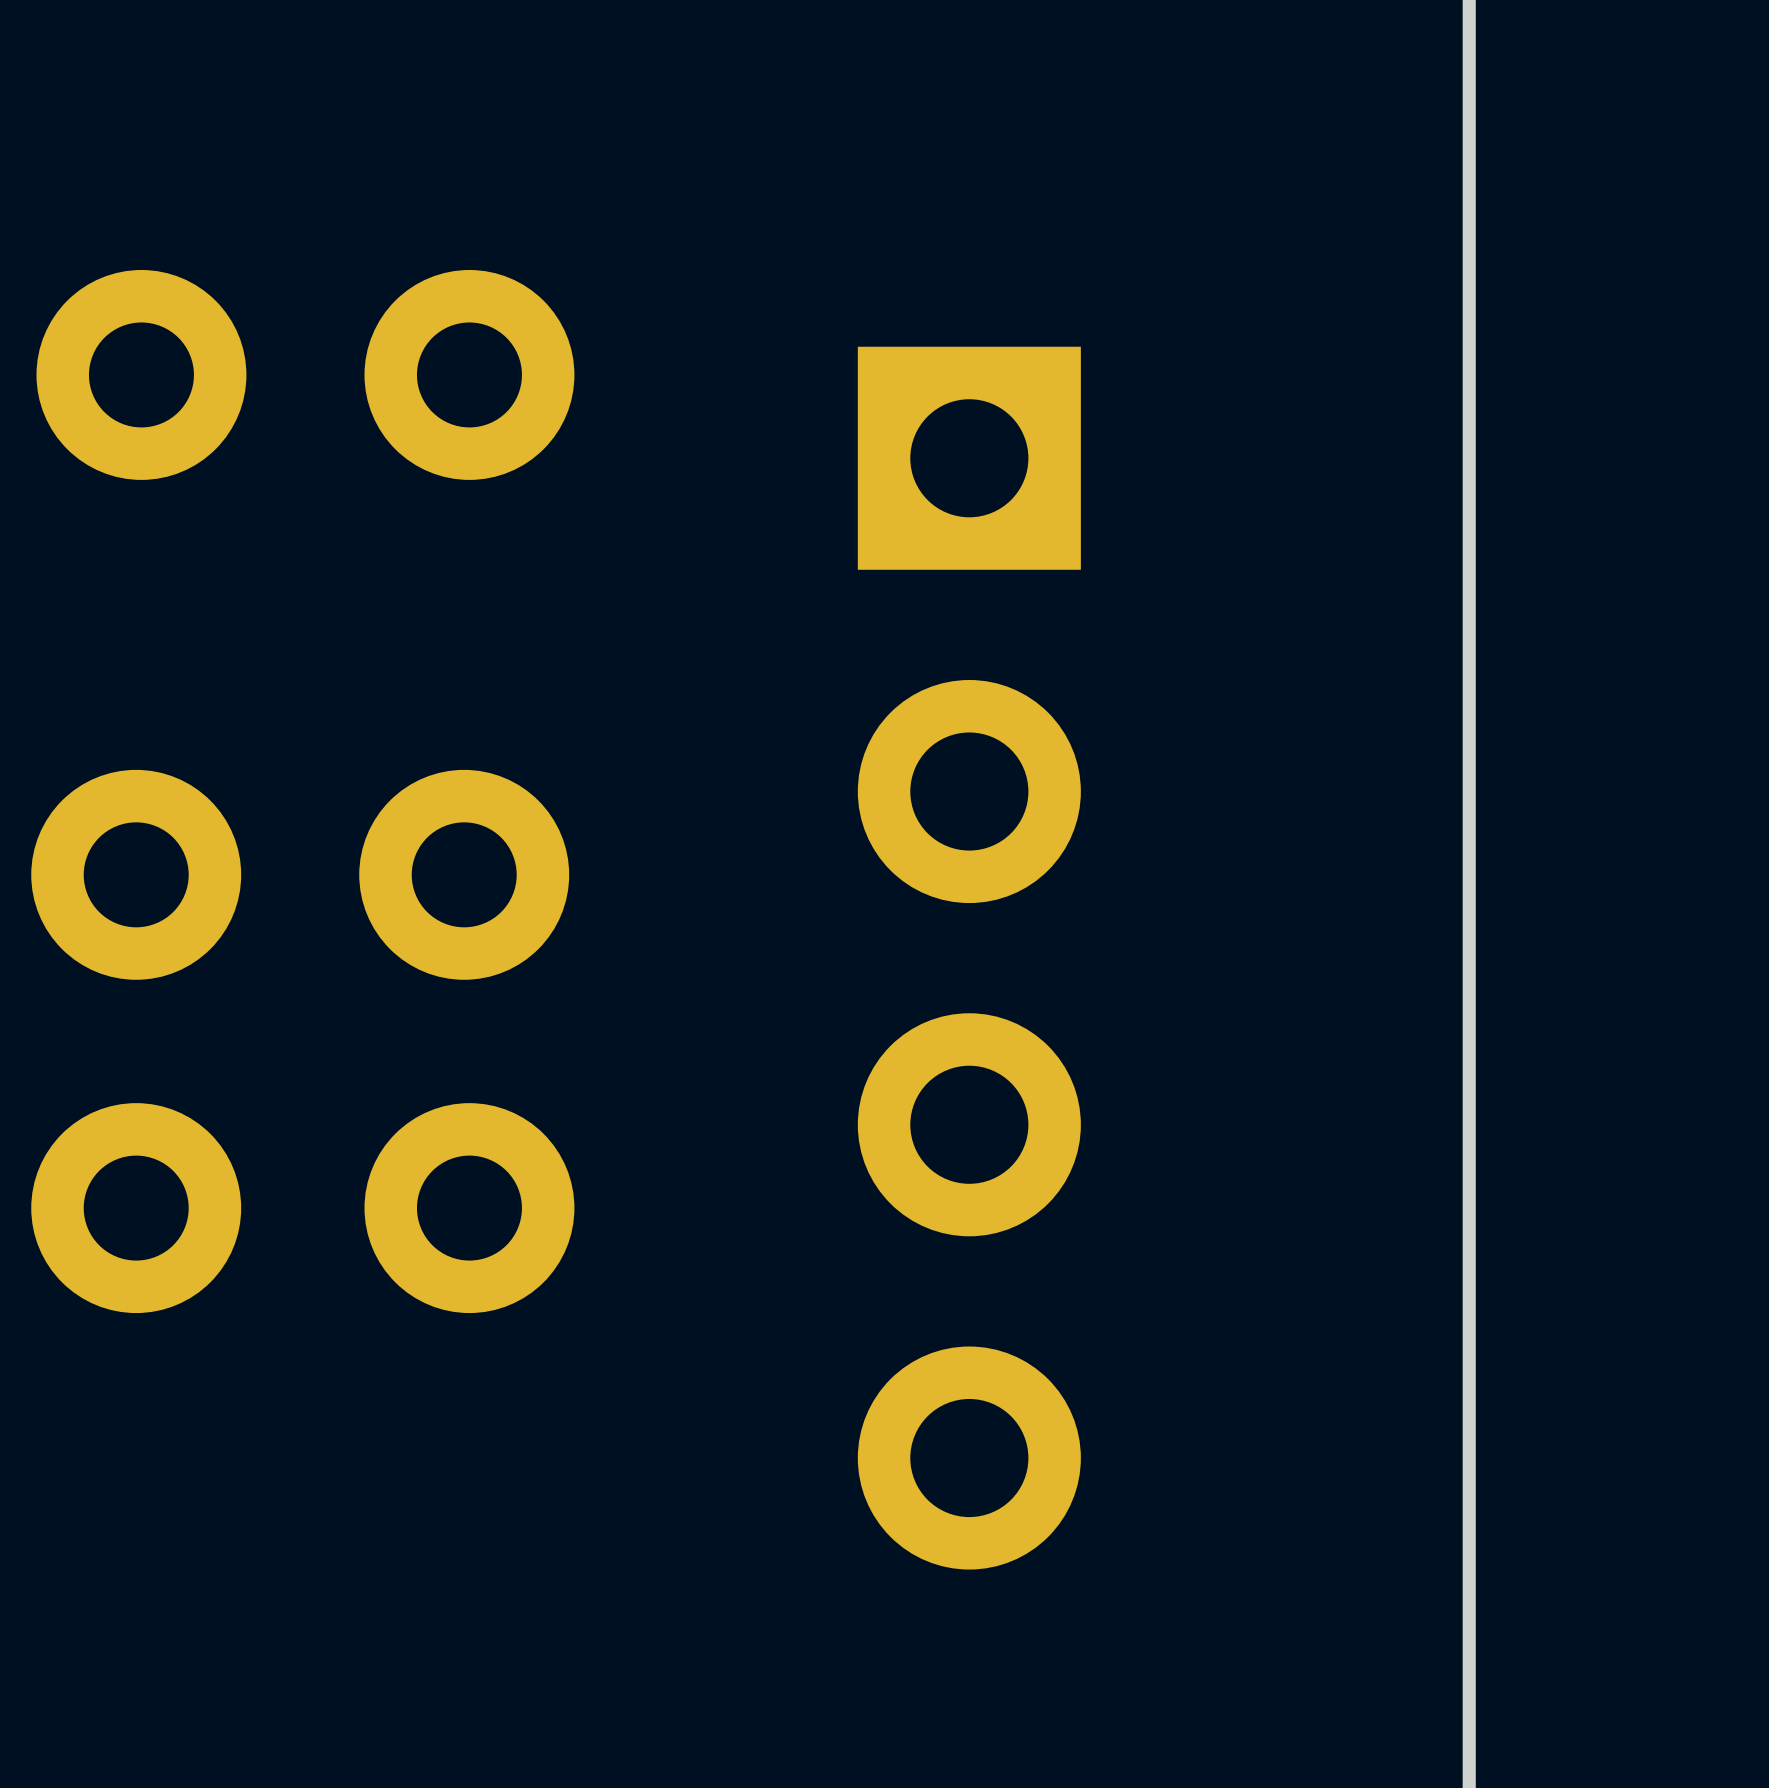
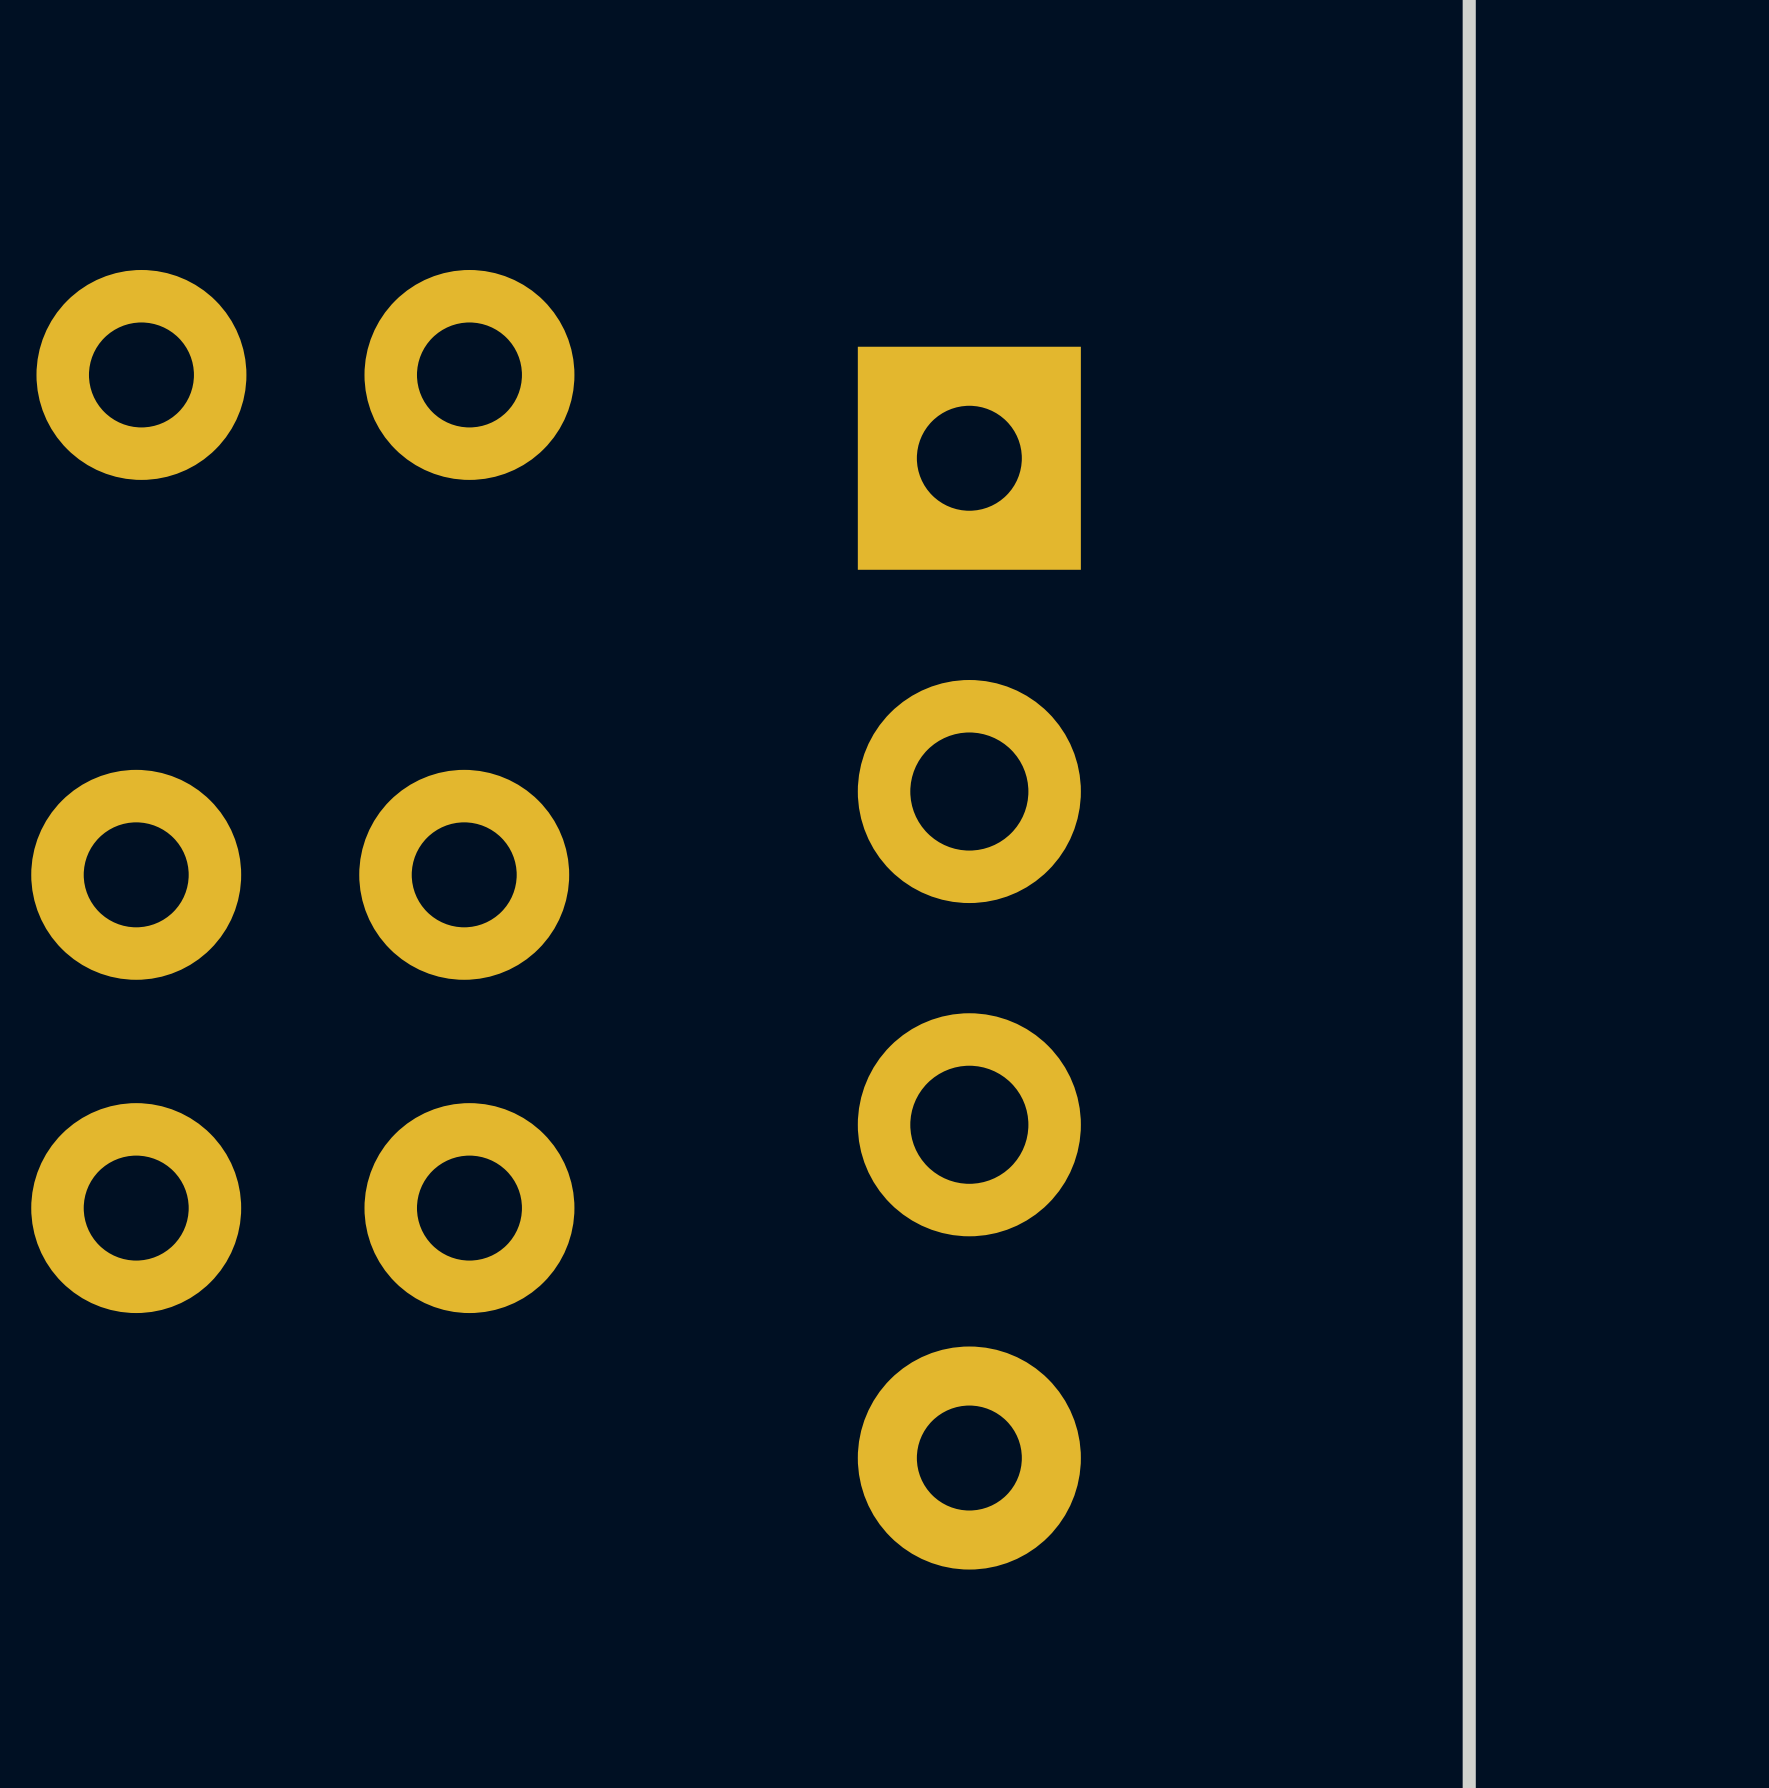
part footprint: [857, 346, 1081, 1570] -> [857, 346, 1081, 1570]

